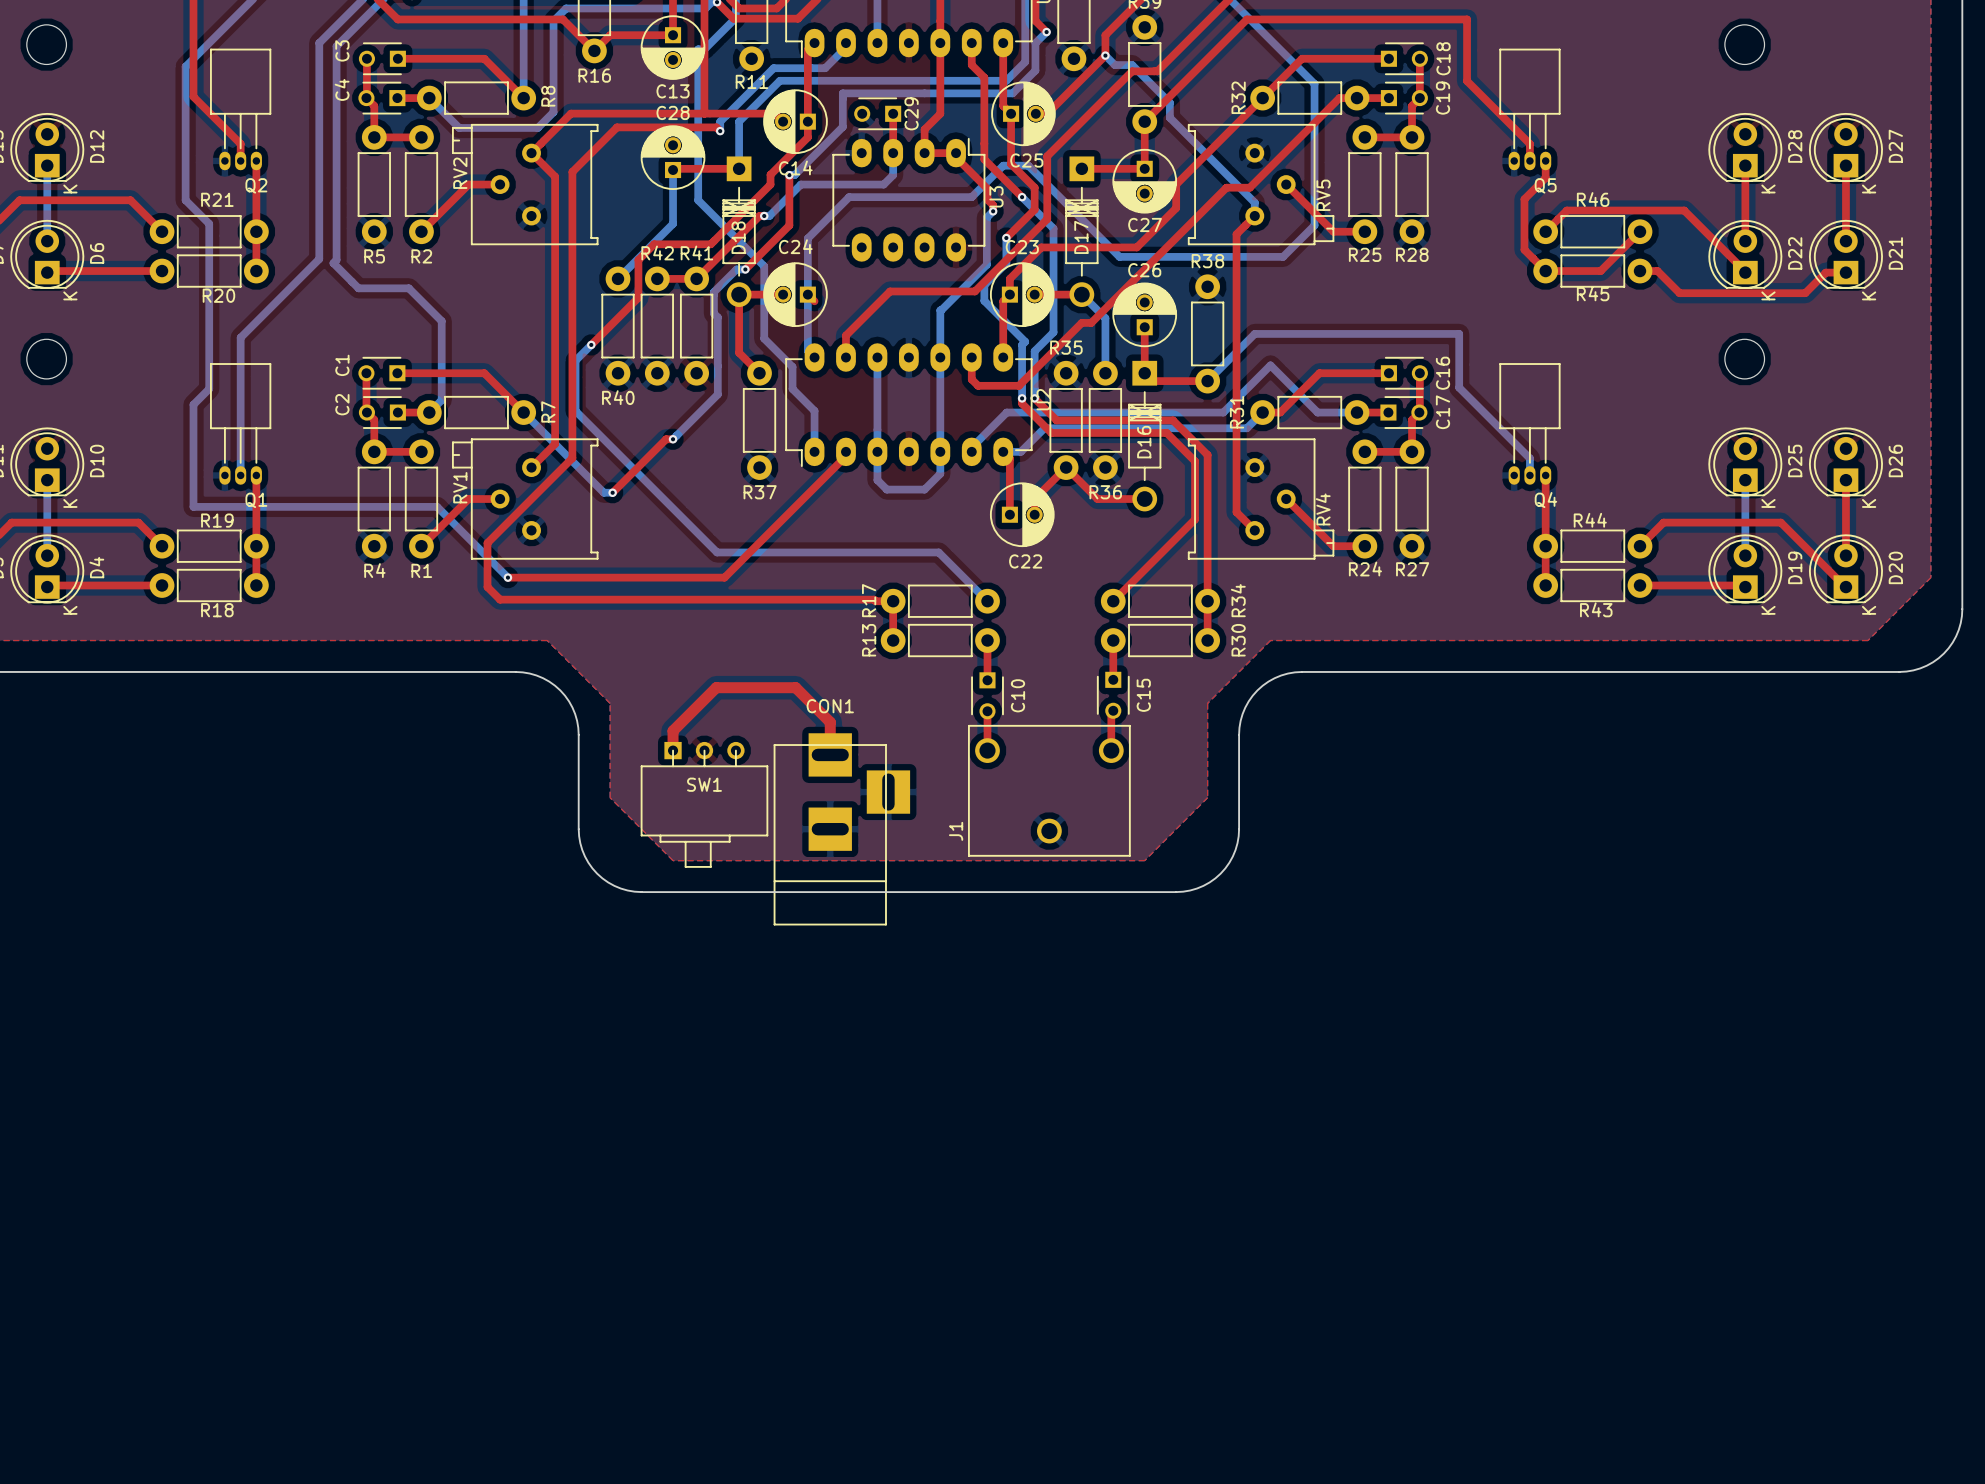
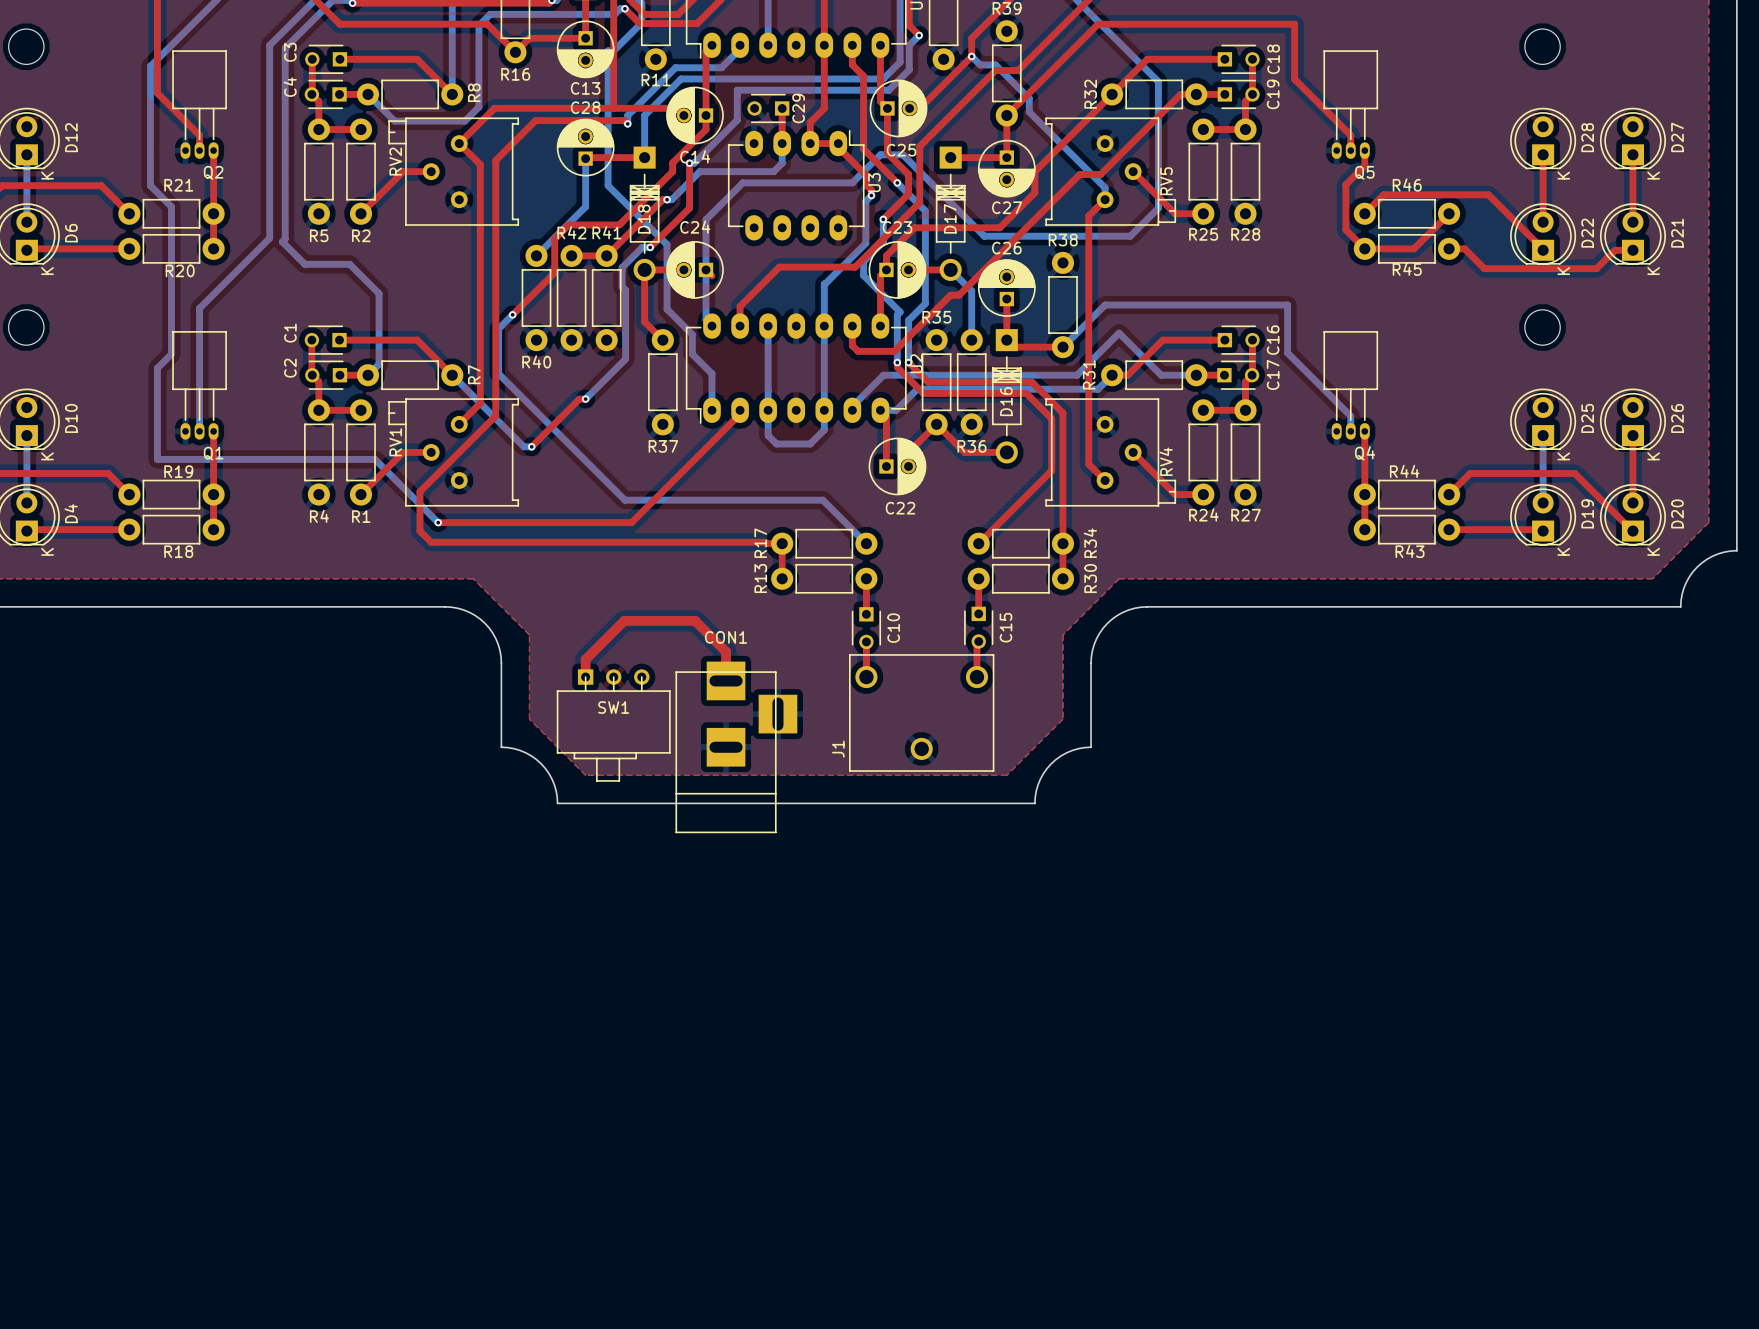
board edge: (1962, 609) (1960, 623) (1956, 636) (1943, 653) (1926, 665) (1913, 670) (1899, 671) -> (1736, 550) (1718, 553) (1697, 567) (1686, 582) (1680, 606)
board edge: (578, 829) (580, 843) (584, 856) (597, 873) (614, 885) (627, 890) (641, 892) -> (501, 747) (519, 750) (541, 763) (552, 779) (557, 803)
board edge: (1239, 829) (1237, 843) (1232, 856) (1220, 873) (1203, 885) (1190, 890) (1176, 892) -> (1091, 747) (1066, 752) (1051, 763) (1040, 779) (1034, 803)

